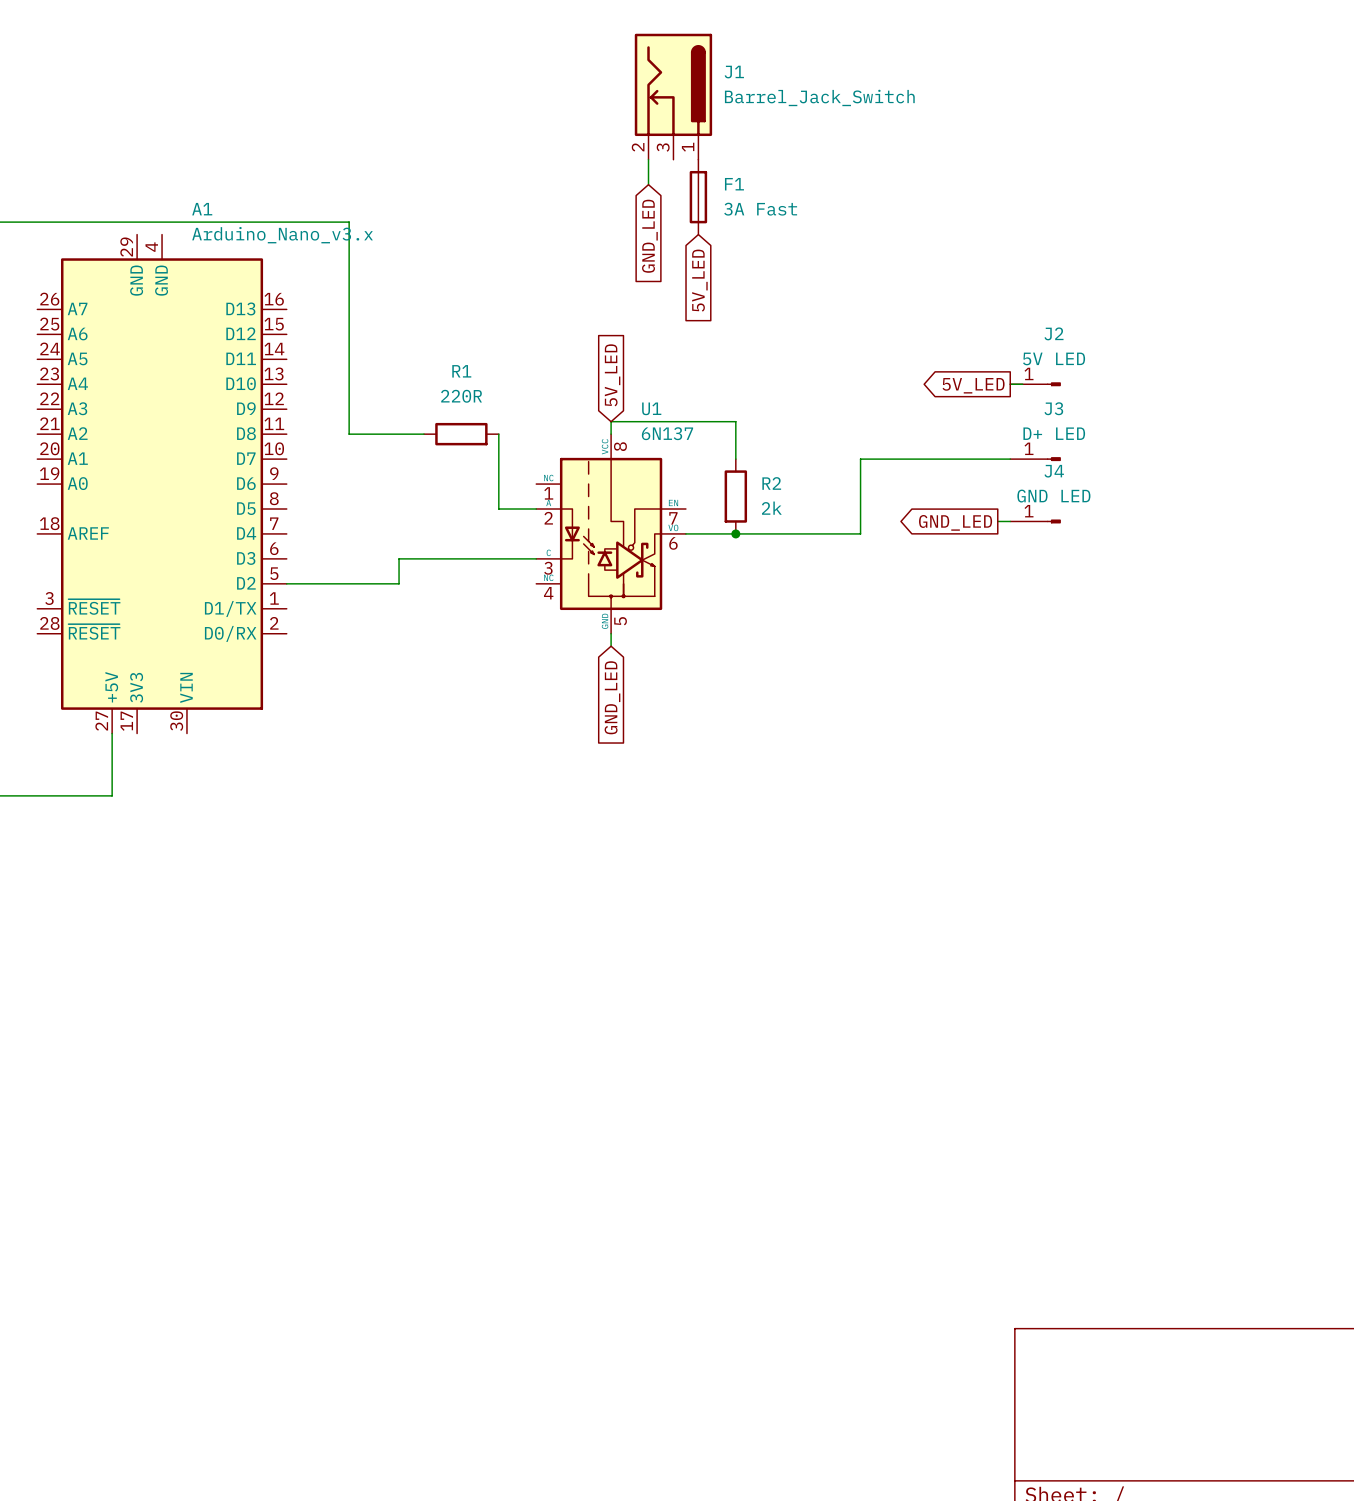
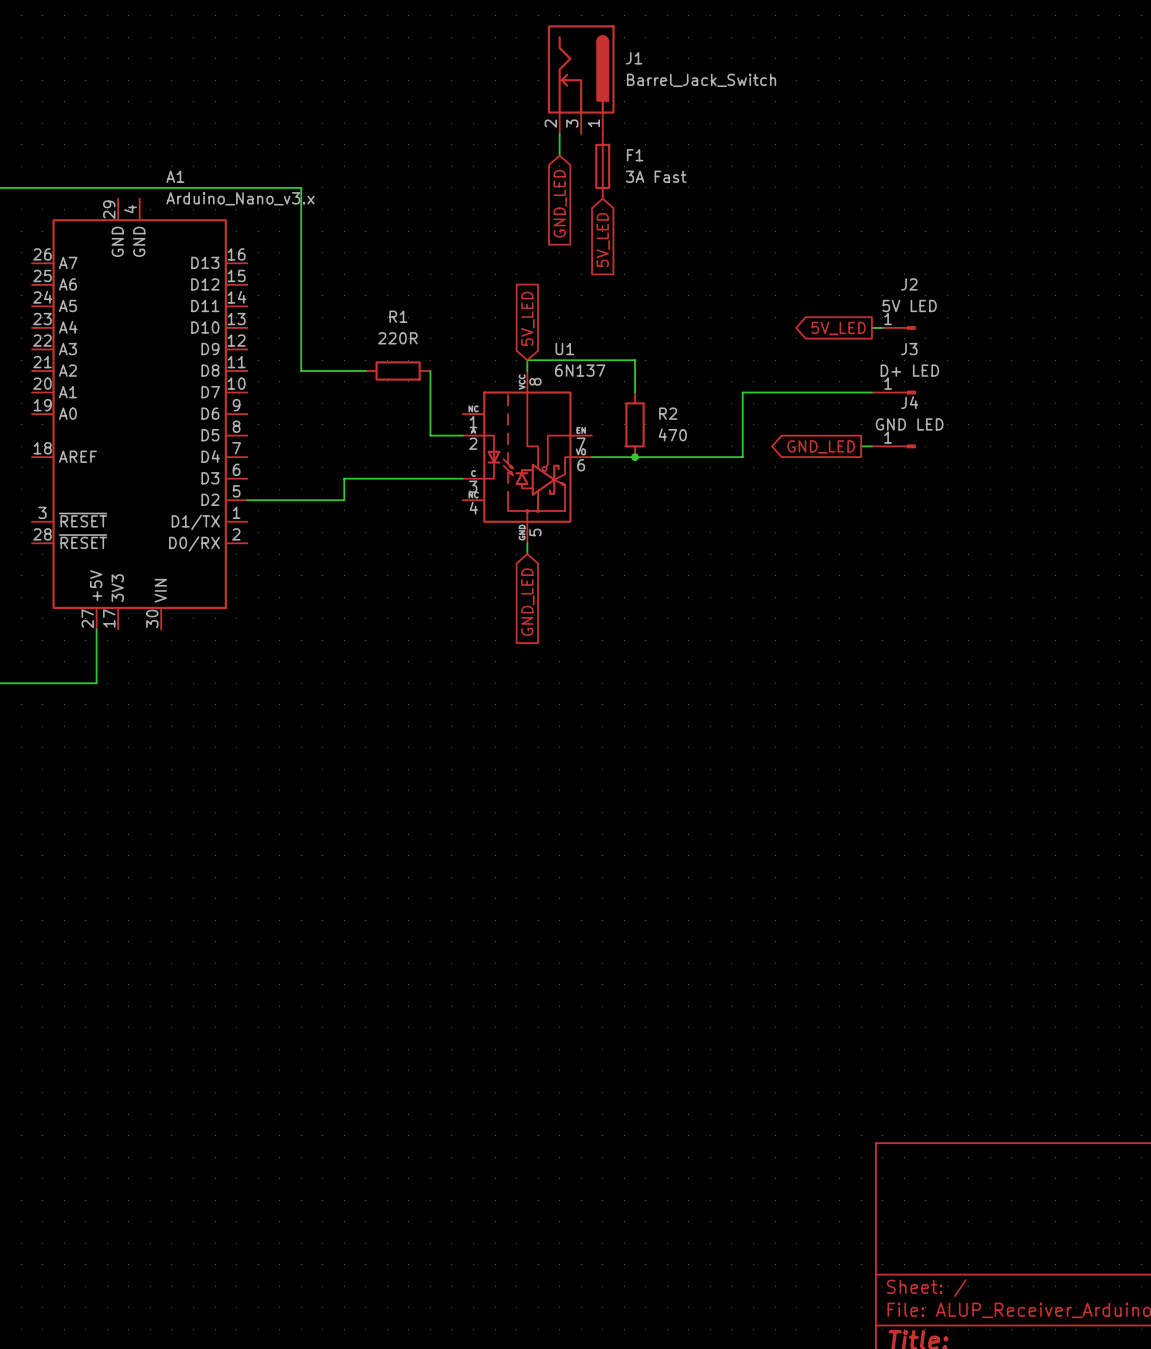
R2 value: 2k (771, 508) -> 470 (672, 434)

